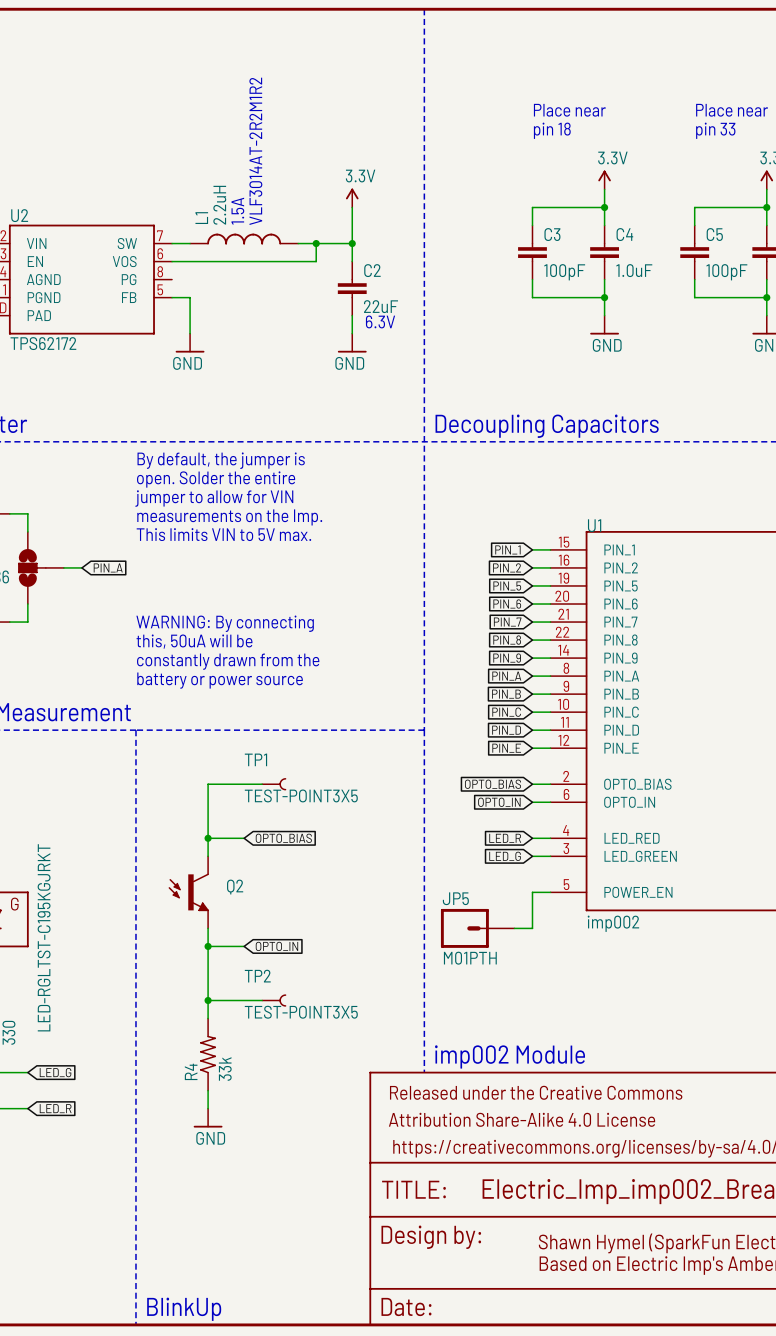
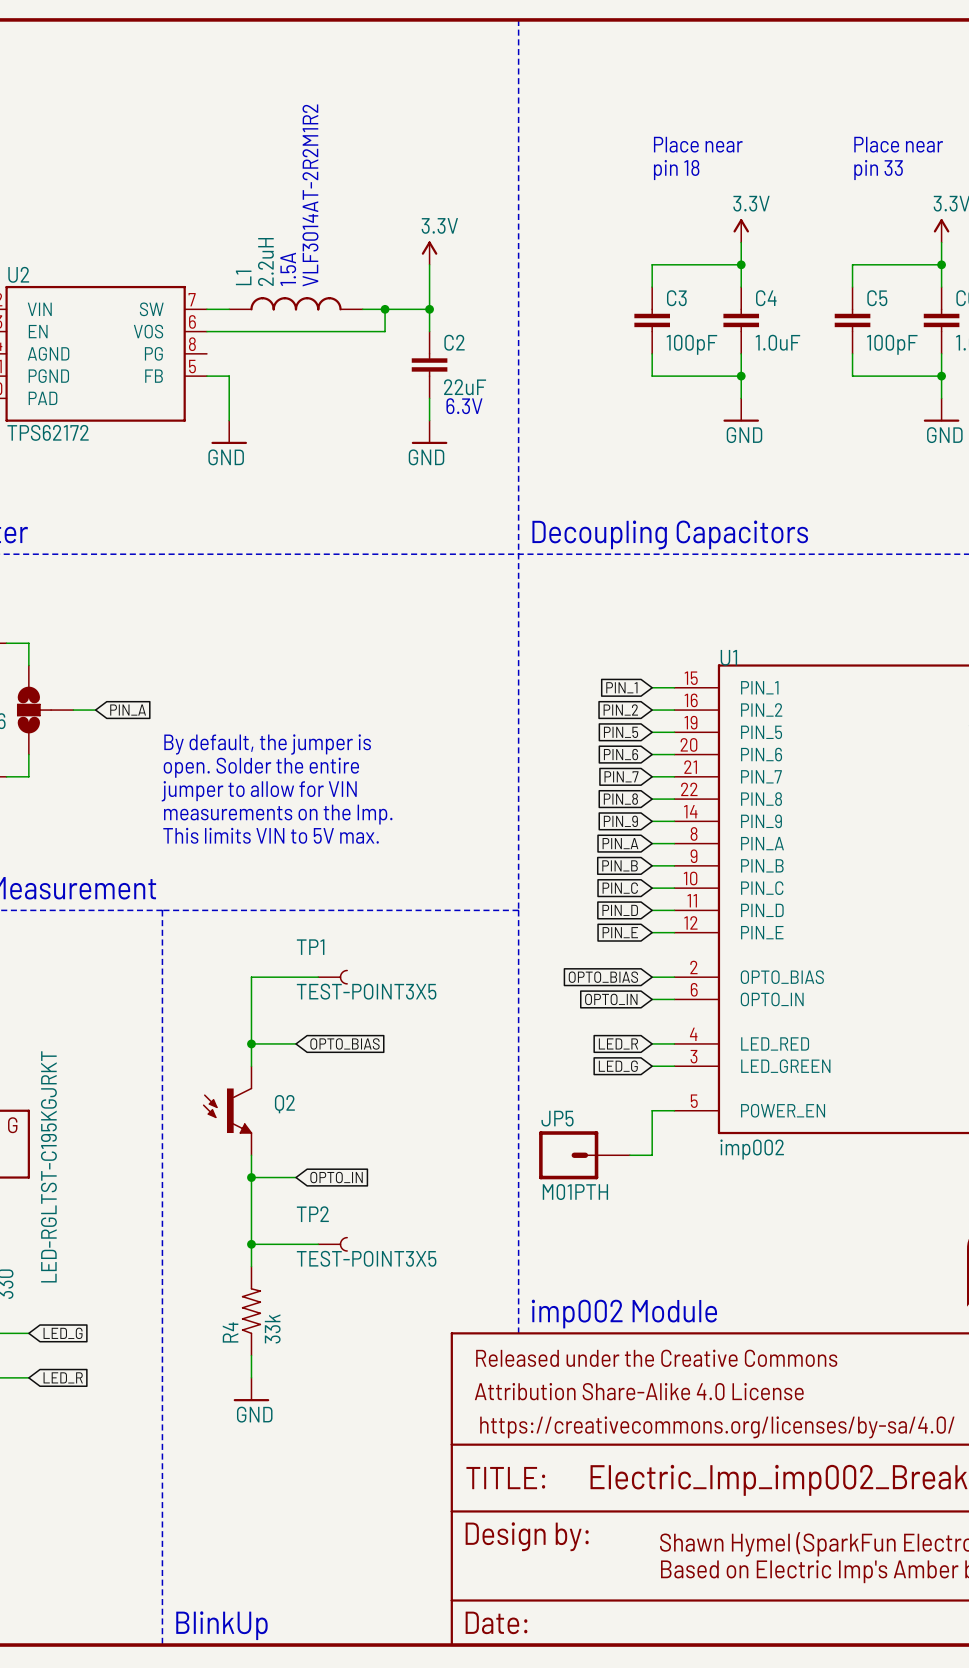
text position: By default, the jumper is (221, 460) -> By default, the jumper is (267, 744)
text position: open. Solder the entire (216, 479) -> open. Solder the entire (261, 767)
text position: jumper to allow for VIN (214, 498) -> jumper to allow for VIN (259, 791)
text position: measurements on the Imp. (229, 517) -> measurements on the Imp. (278, 814)
text position: This limits VIN to 5V max. (223, 534) -> This limits VIN to 5V max. (271, 835)
text: WARNING: By connecting (225, 623) -> none
text: this, 50uA will be (194, 641) -> none
text: constantly drawn from the (228, 661) -> none
text: battery or power source (220, 680) -> none

